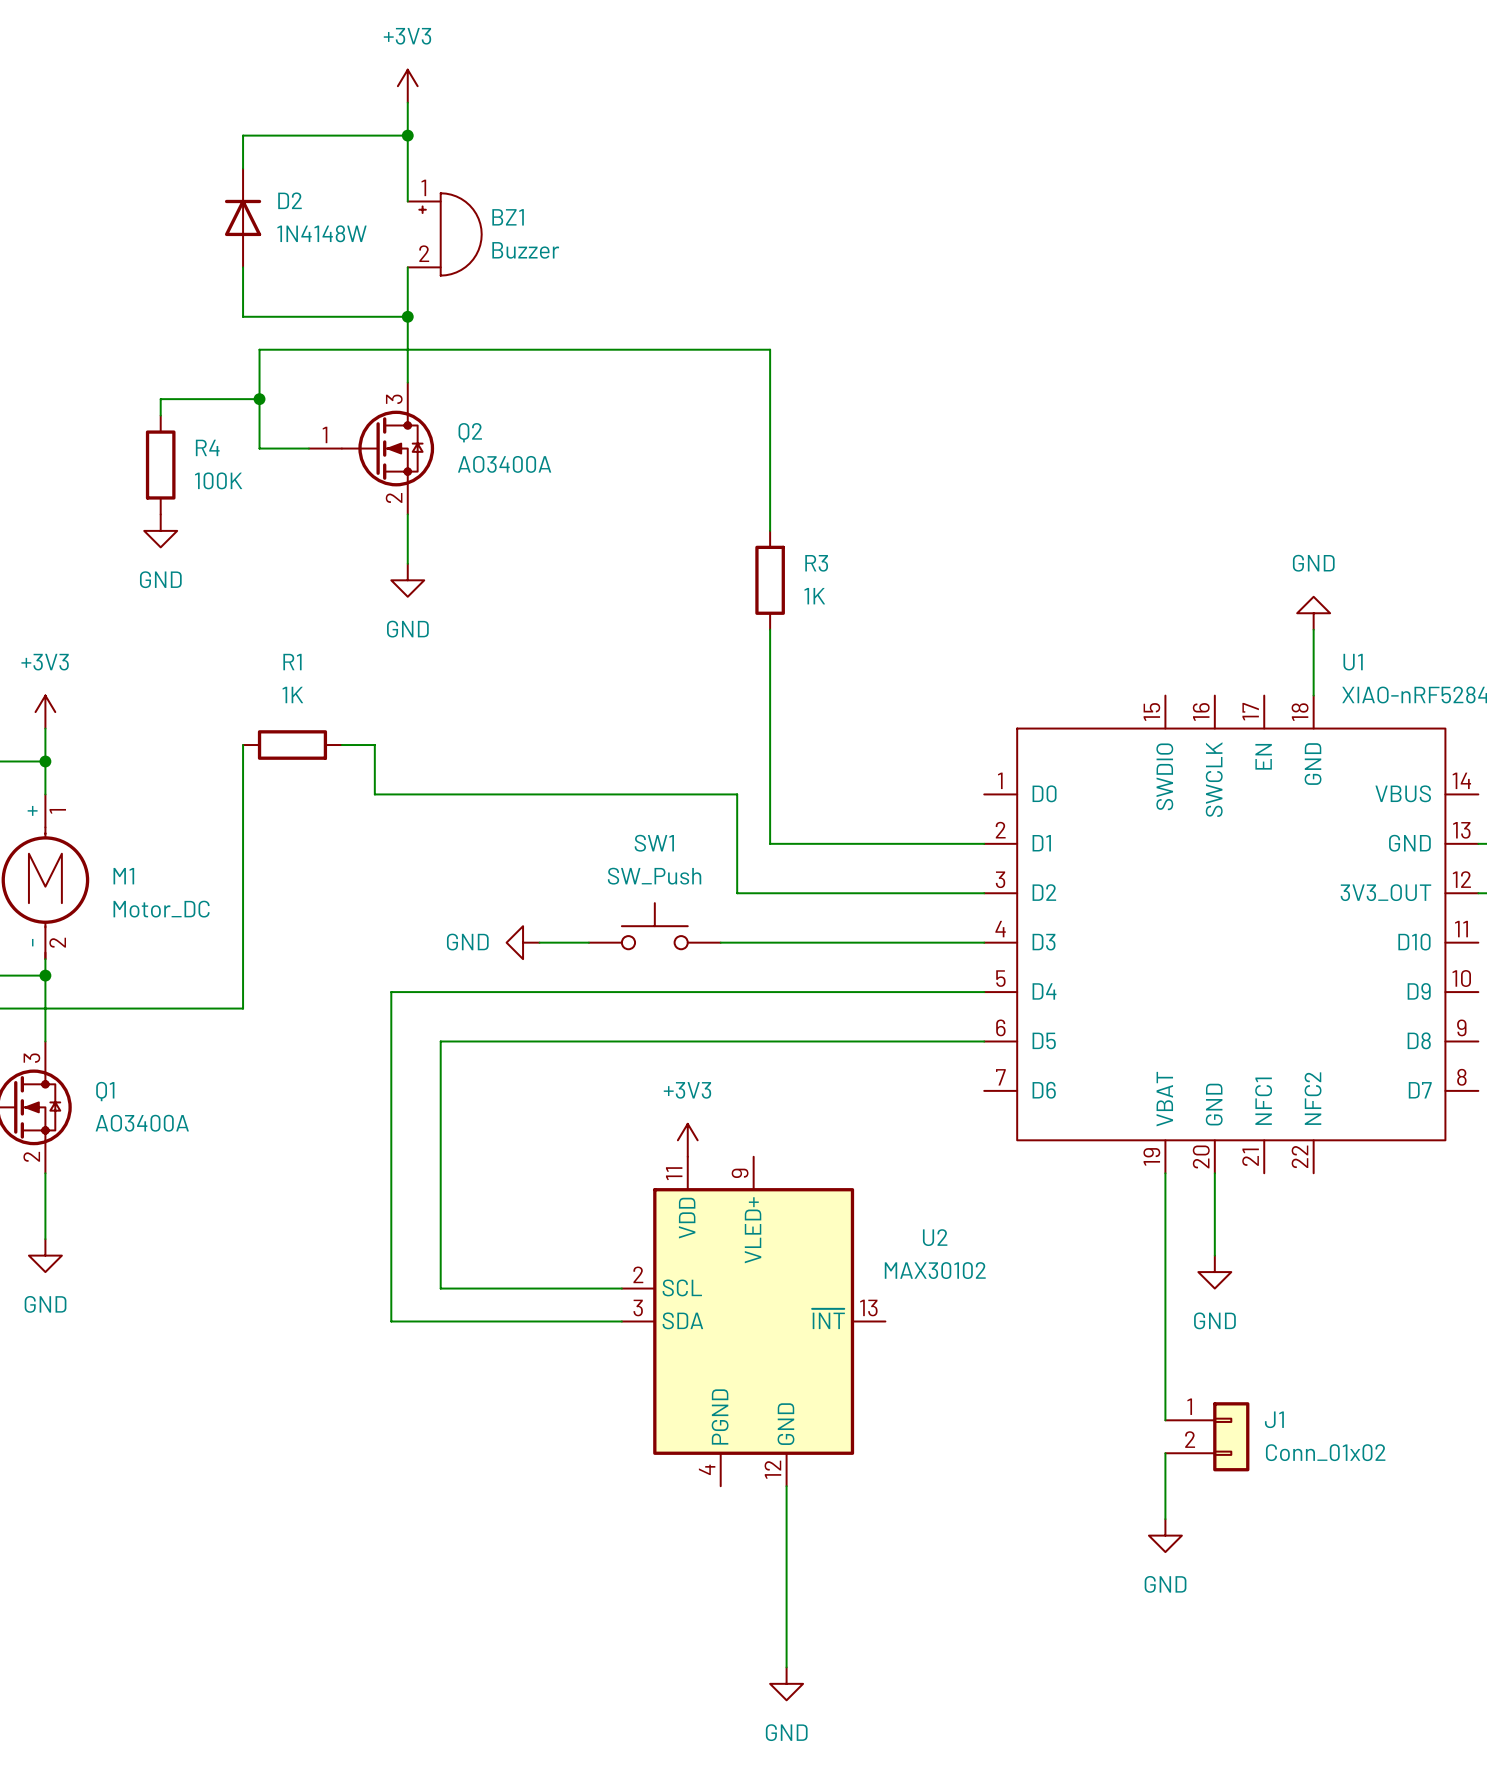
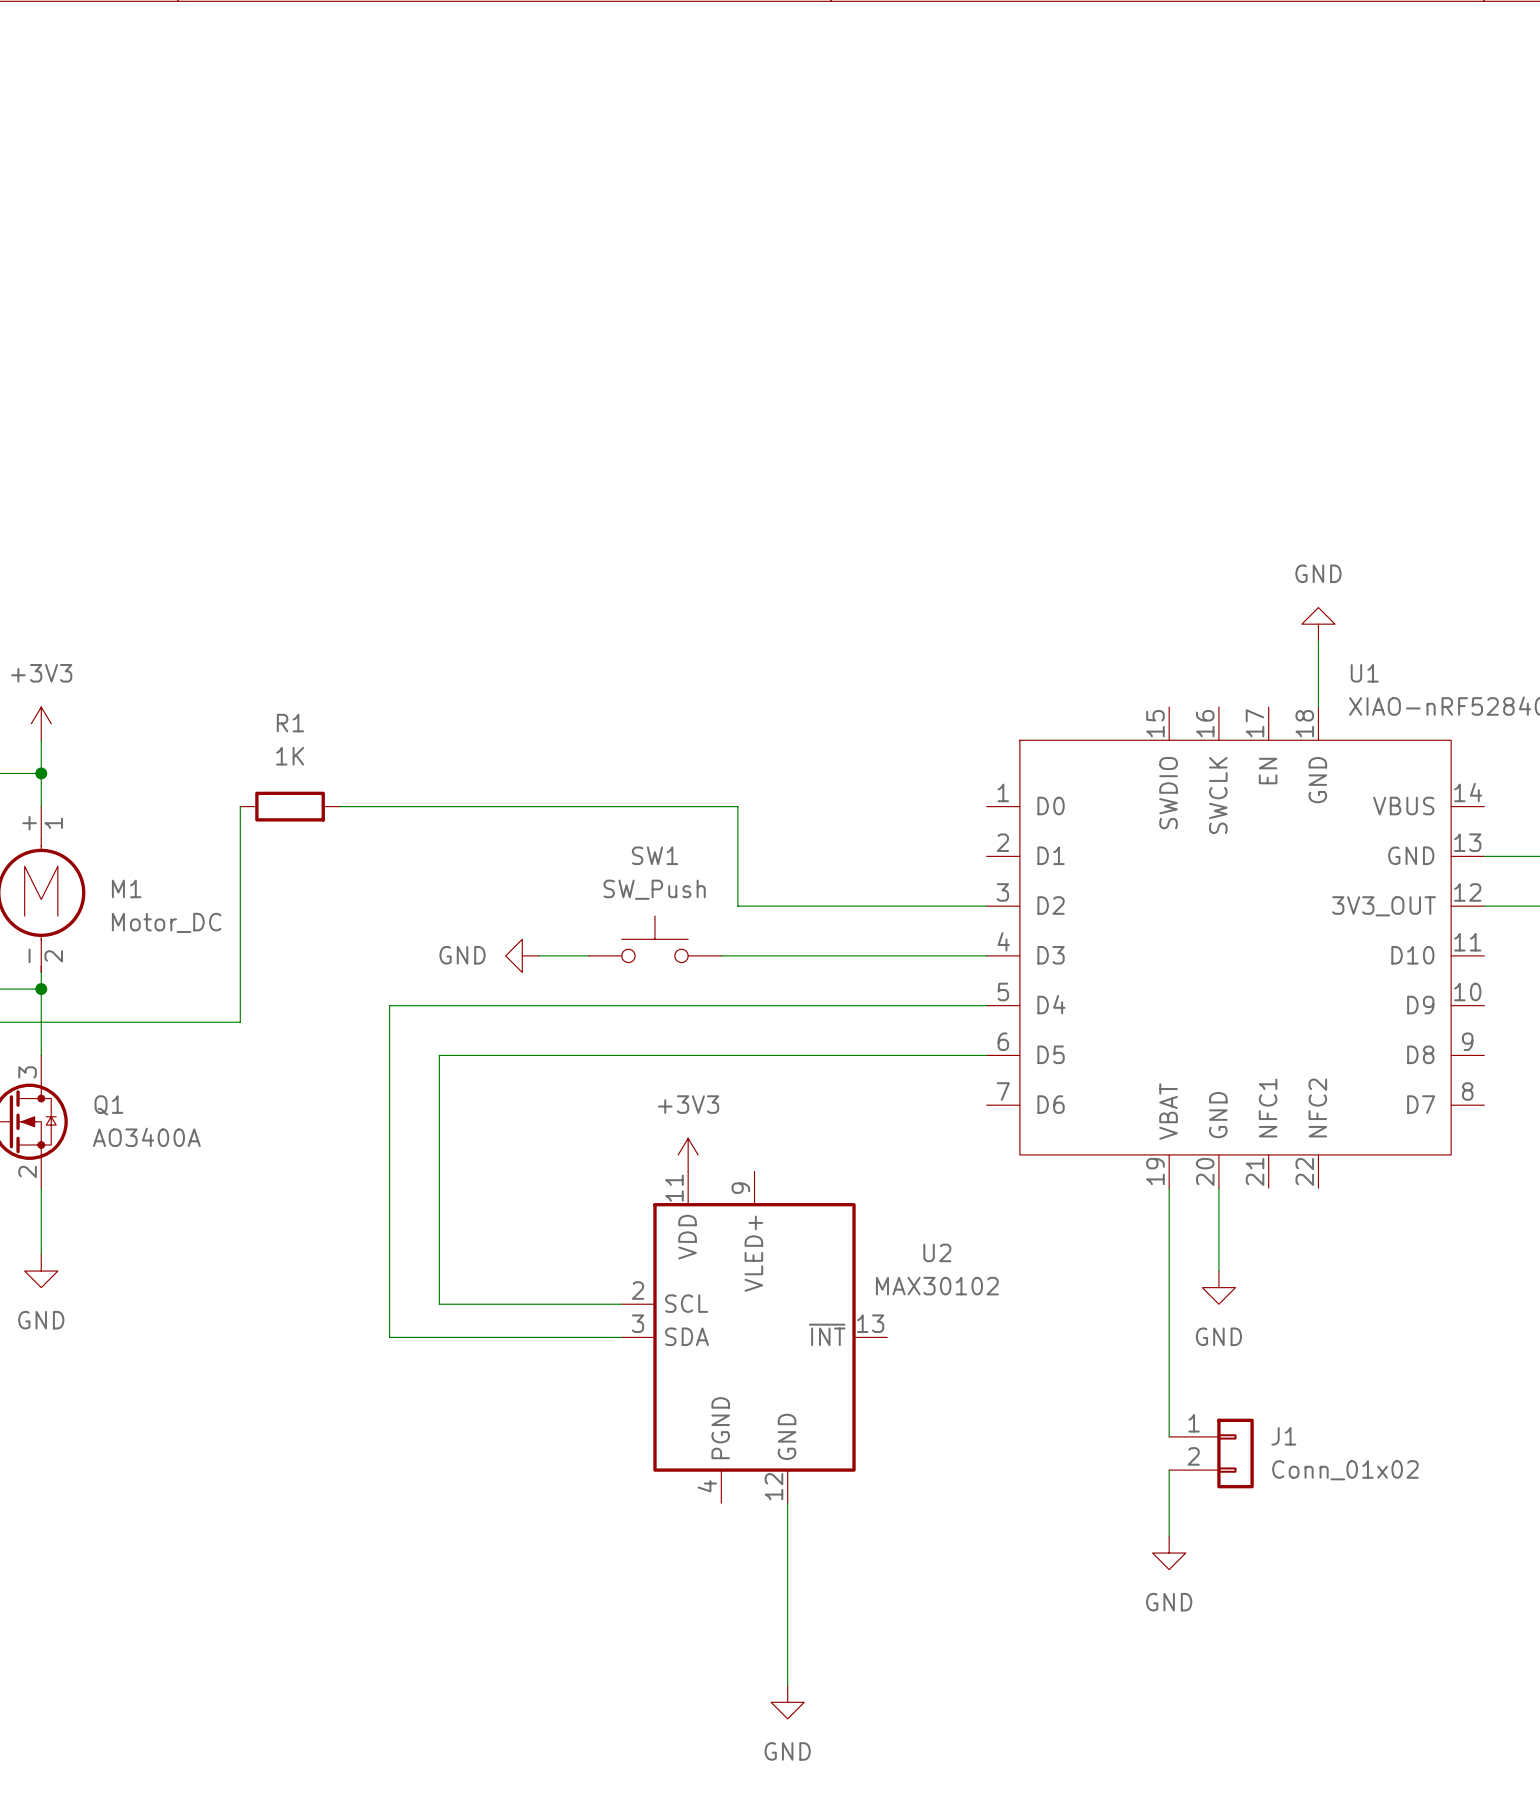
power symbol: +3V3 (407, 86) -> none
wire: (407, 102) (407, 201) -> none
wire: (407, 135) (243, 135) (243, 168) -> none
junction: (407, 135) -> none
D2: 1N4148W (243, 217) -> none
BZ1: Buzzer (444, 234) -> none
wire: (243, 267) (243, 316) (407, 316) -> none
wire: (407, 267) (407, 382) -> none
junction: (407, 316) -> none
wire: (259, 399) (160, 399) (160, 415) -> none
junction: (259, 399) -> none
wire: (308, 448) (259, 448) (259, 349) (770, 349) (770, 530) -> none
Q2: AO3400A (371, 448) -> none
R4: 100K (160, 465) -> none
wire: (407, 514) (407, 563) -> none
power symbol: GND (160, 530) -> none
power symbol: GND (407, 580) -> none
R3: 1K (770, 580) -> none
wire: (770, 629) (770, 843) (984, 843) -> none
wire: (243, 745) (243, 794) -> none
R1 position: (292, 745) -> (290, 806)
wire: (341, 745) (374, 745) (374, 794) -> (339, 806) (373, 806)

